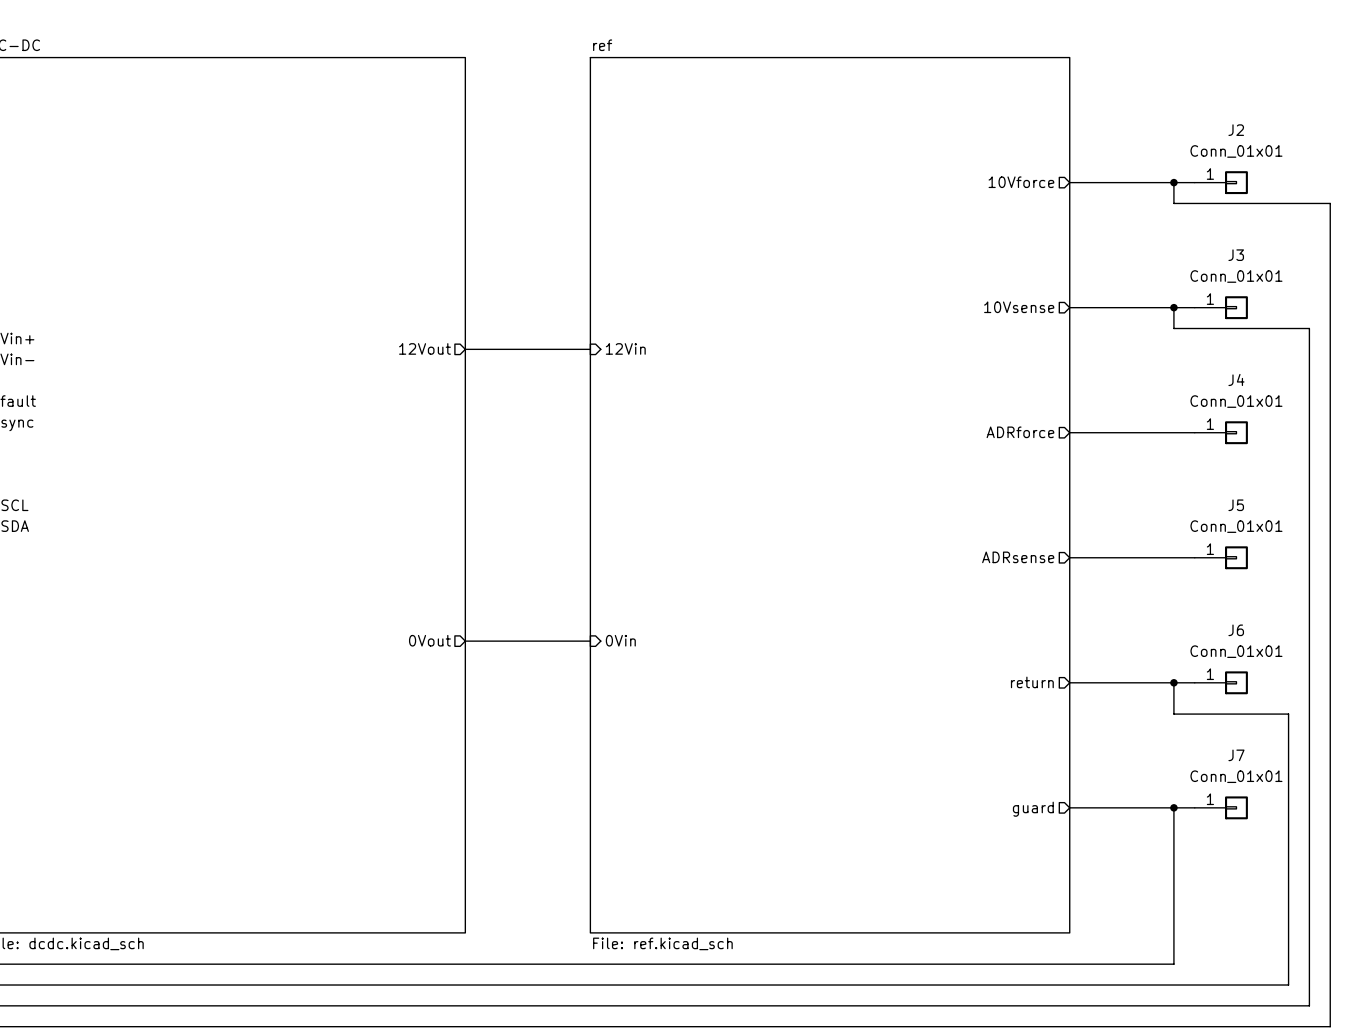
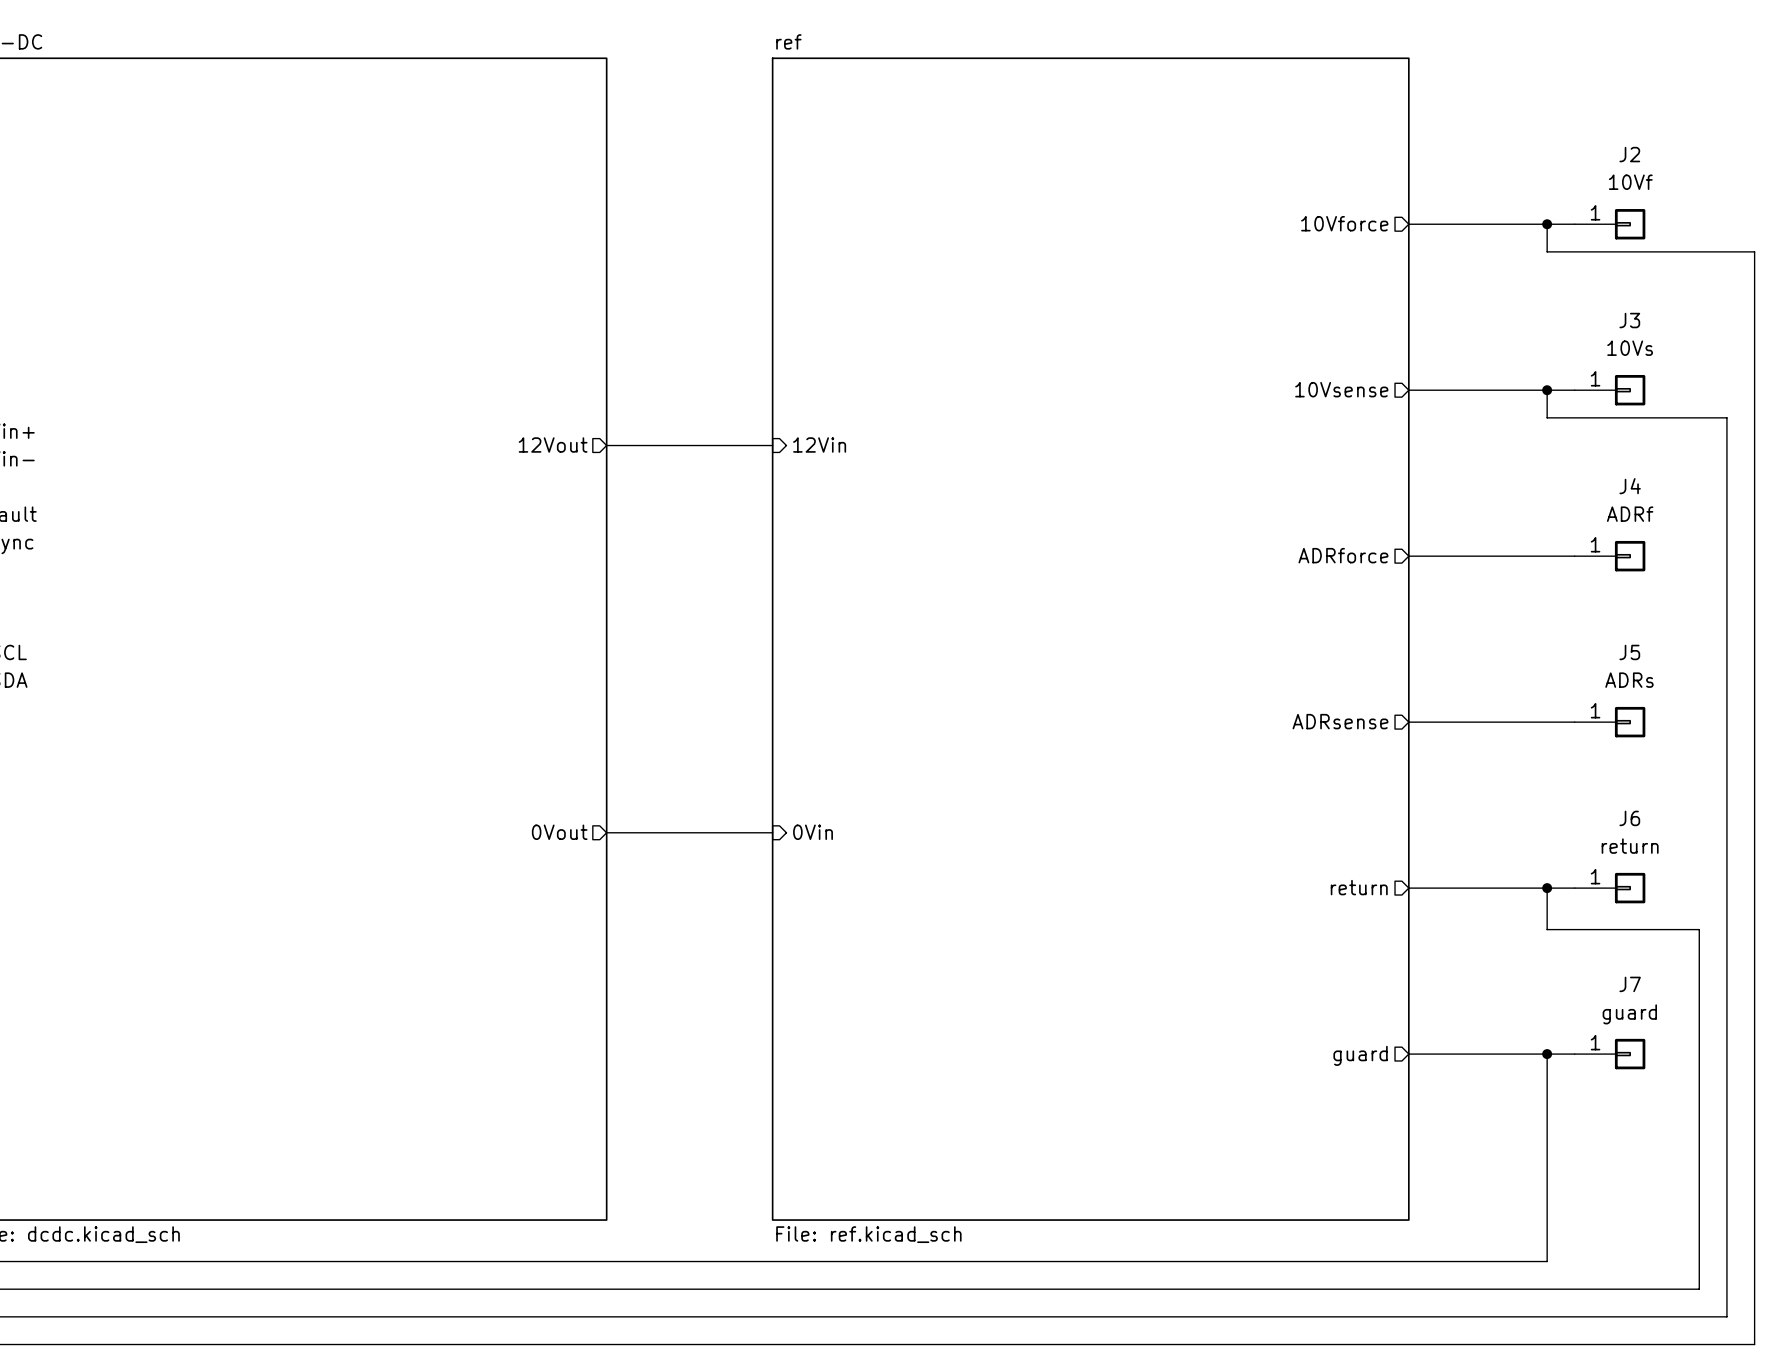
J2 value: Conn_01x01 (1236, 151) -> 10Vf (1630, 182)
J3 value: Conn_01x01 (1236, 276) -> 10Vs (1630, 348)
J4 value: Conn_01x01 (1236, 401) -> ADRf (1630, 514)
J5 value: Conn_01x01 (1236, 526) -> ADRs (1629, 680)
J6 value: Conn_01x01 (1236, 651) -> return (1630, 846)
J7 value: Conn_01x01 (1236, 776) -> guard (1629, 1014)

